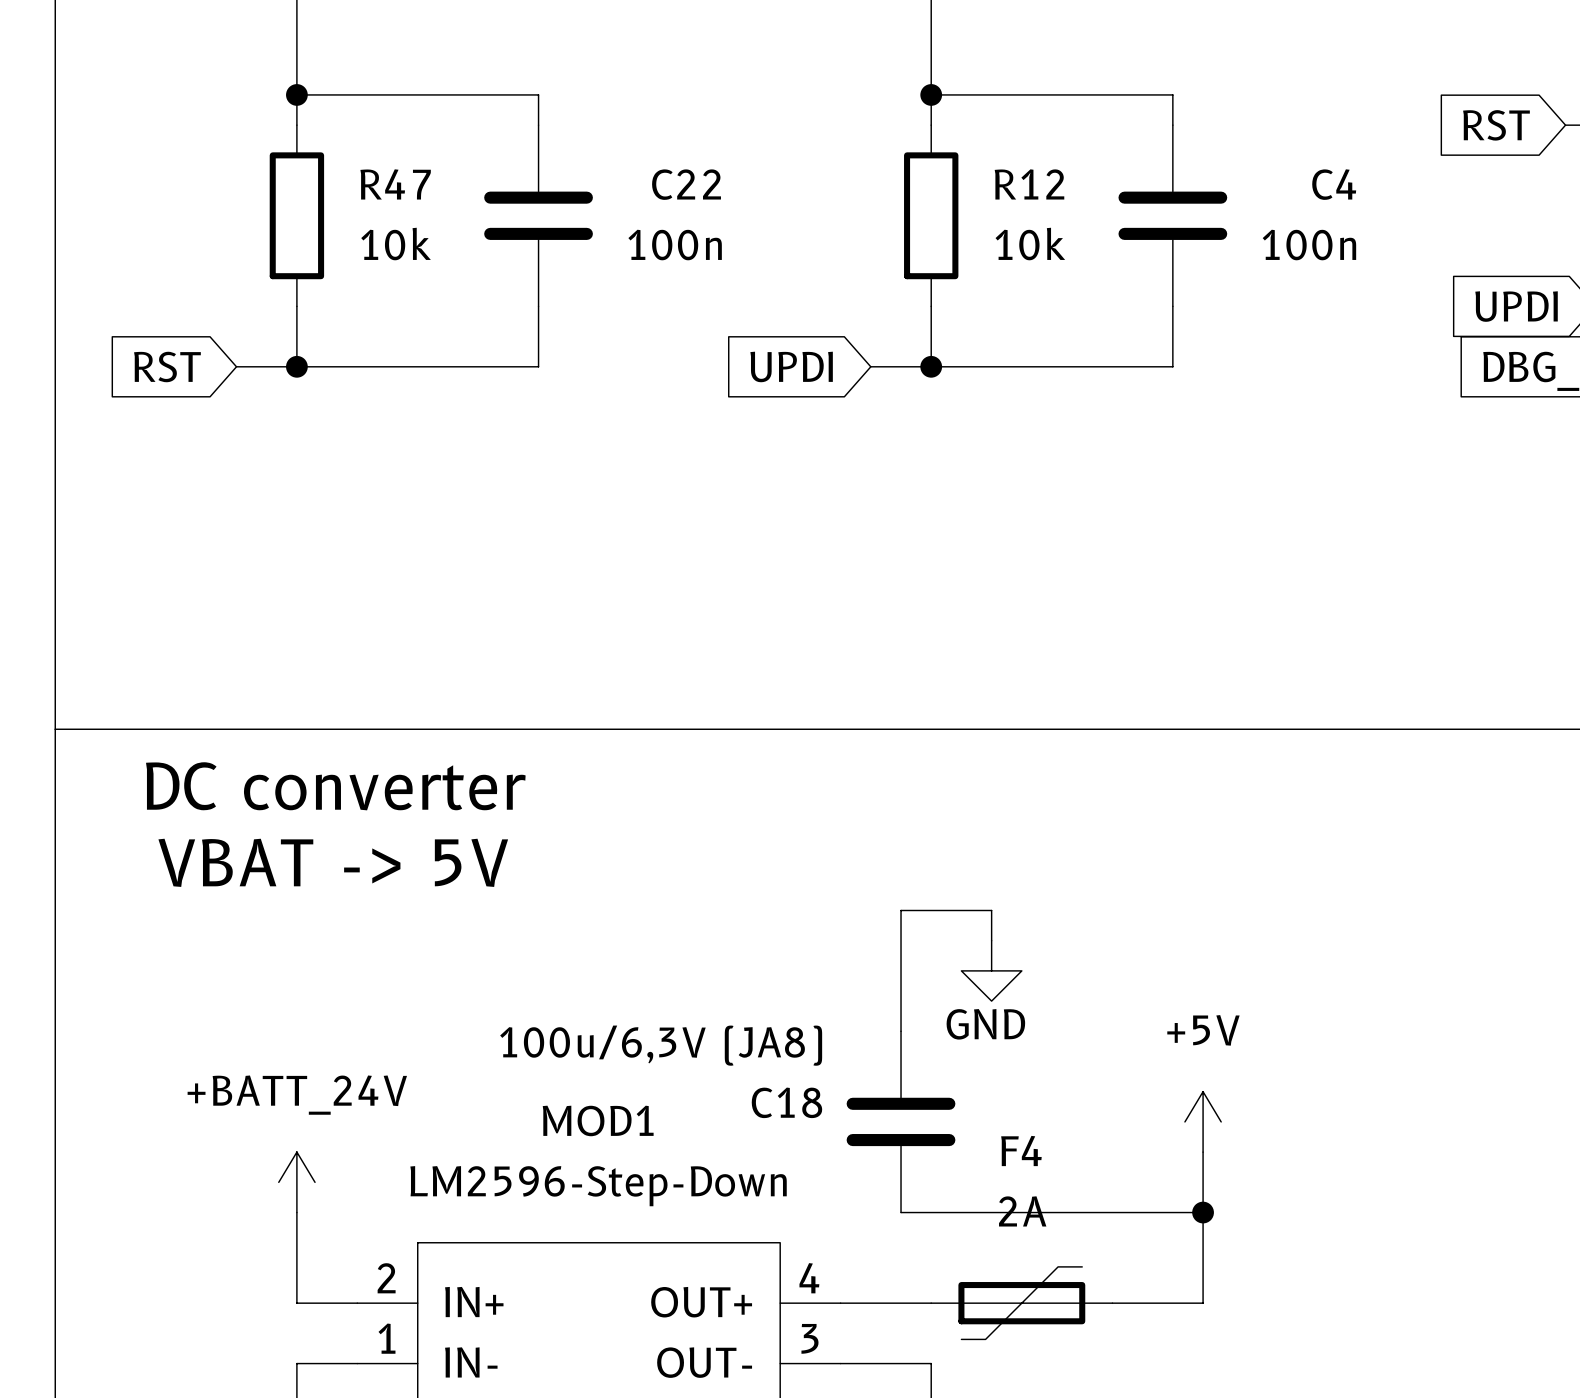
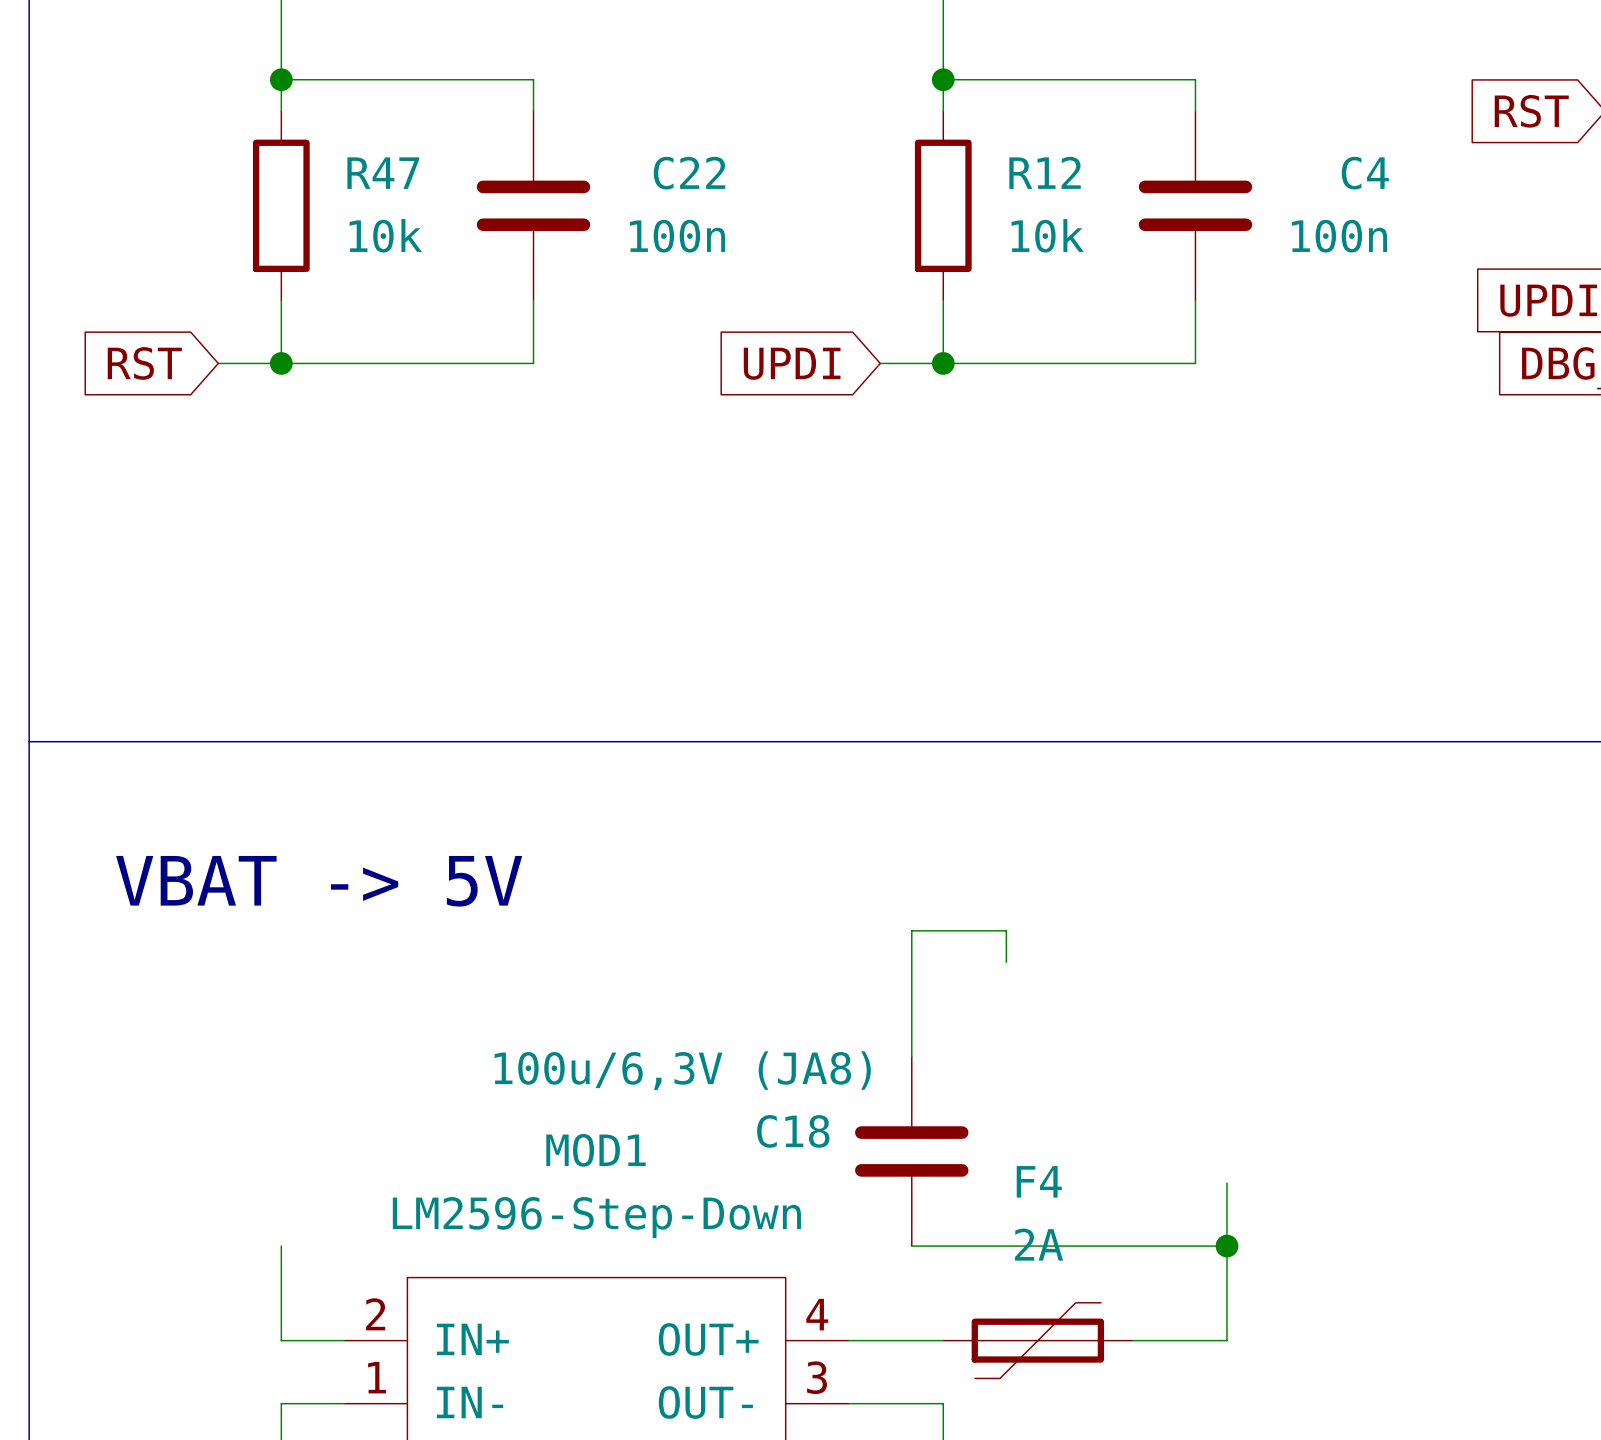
text: DC converter (335, 786) -> none
power symbol: GND (991, 970) -> none
power symbol: +5V (1203, 1121) -> none
power symbol: +BATT_24V (296, 1182) -> none

